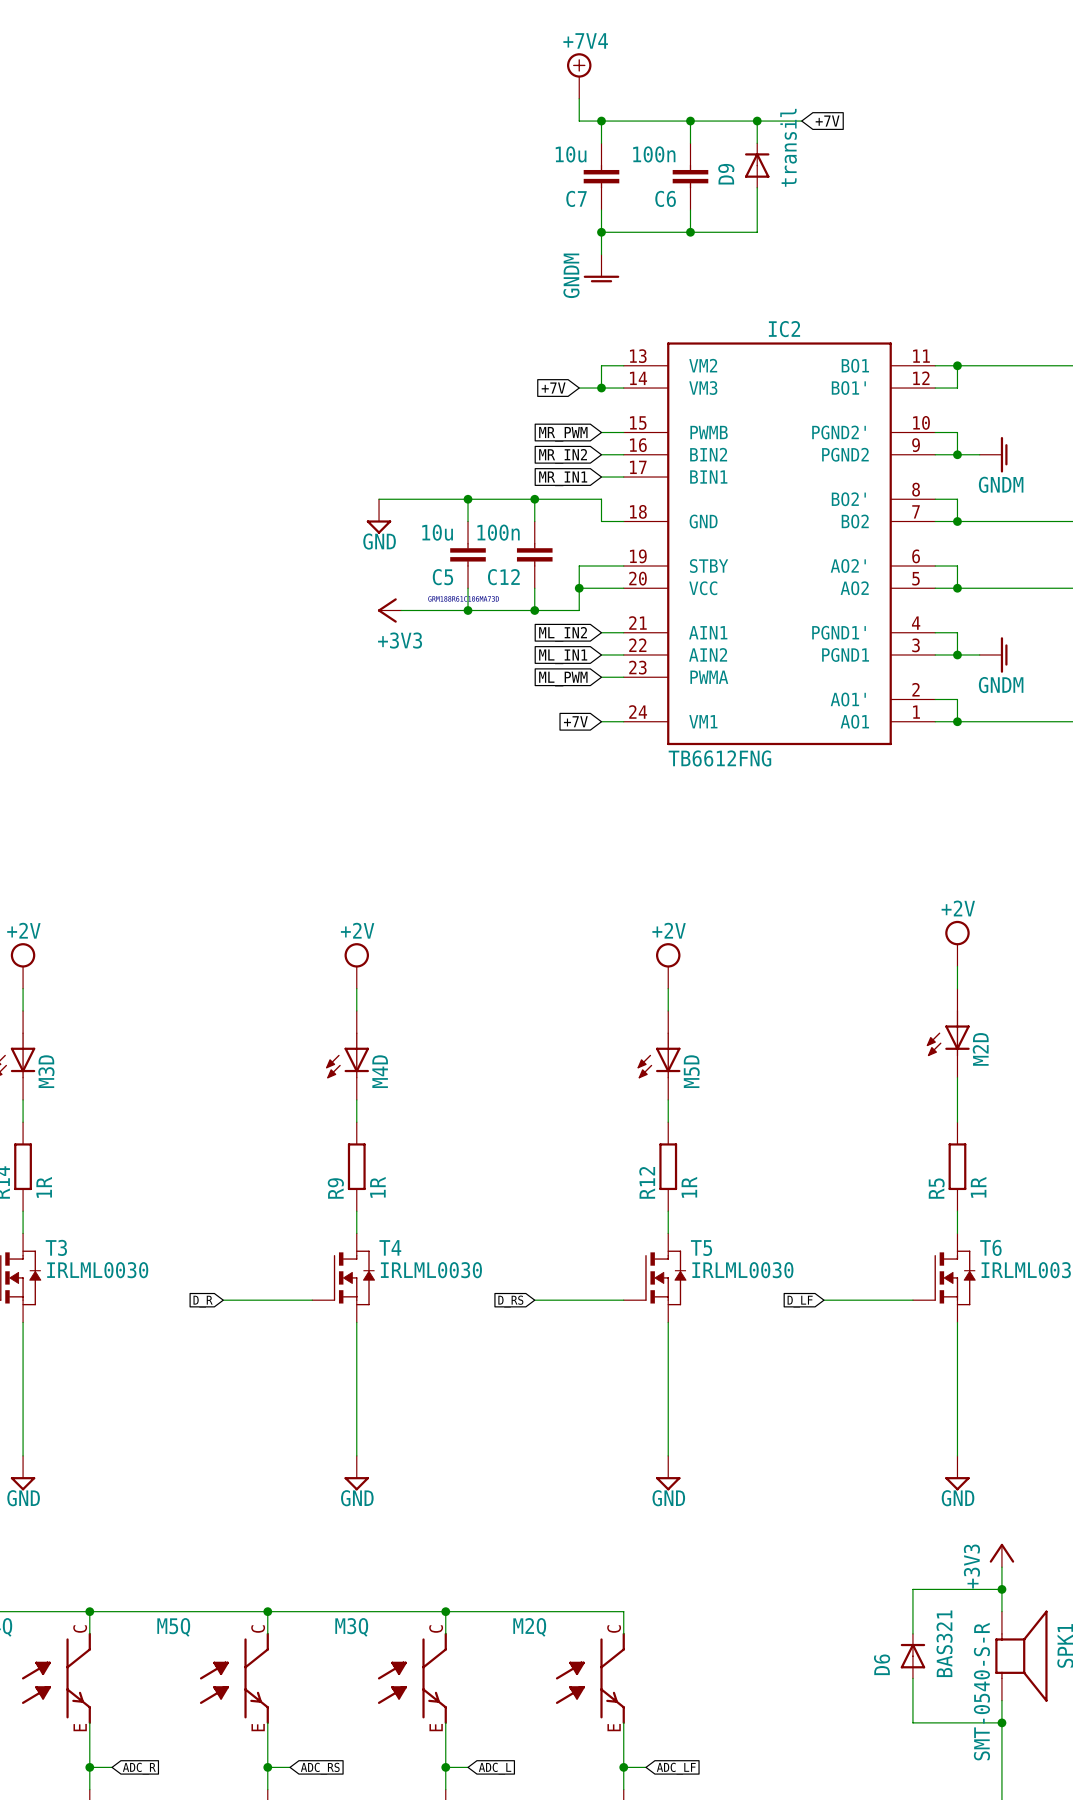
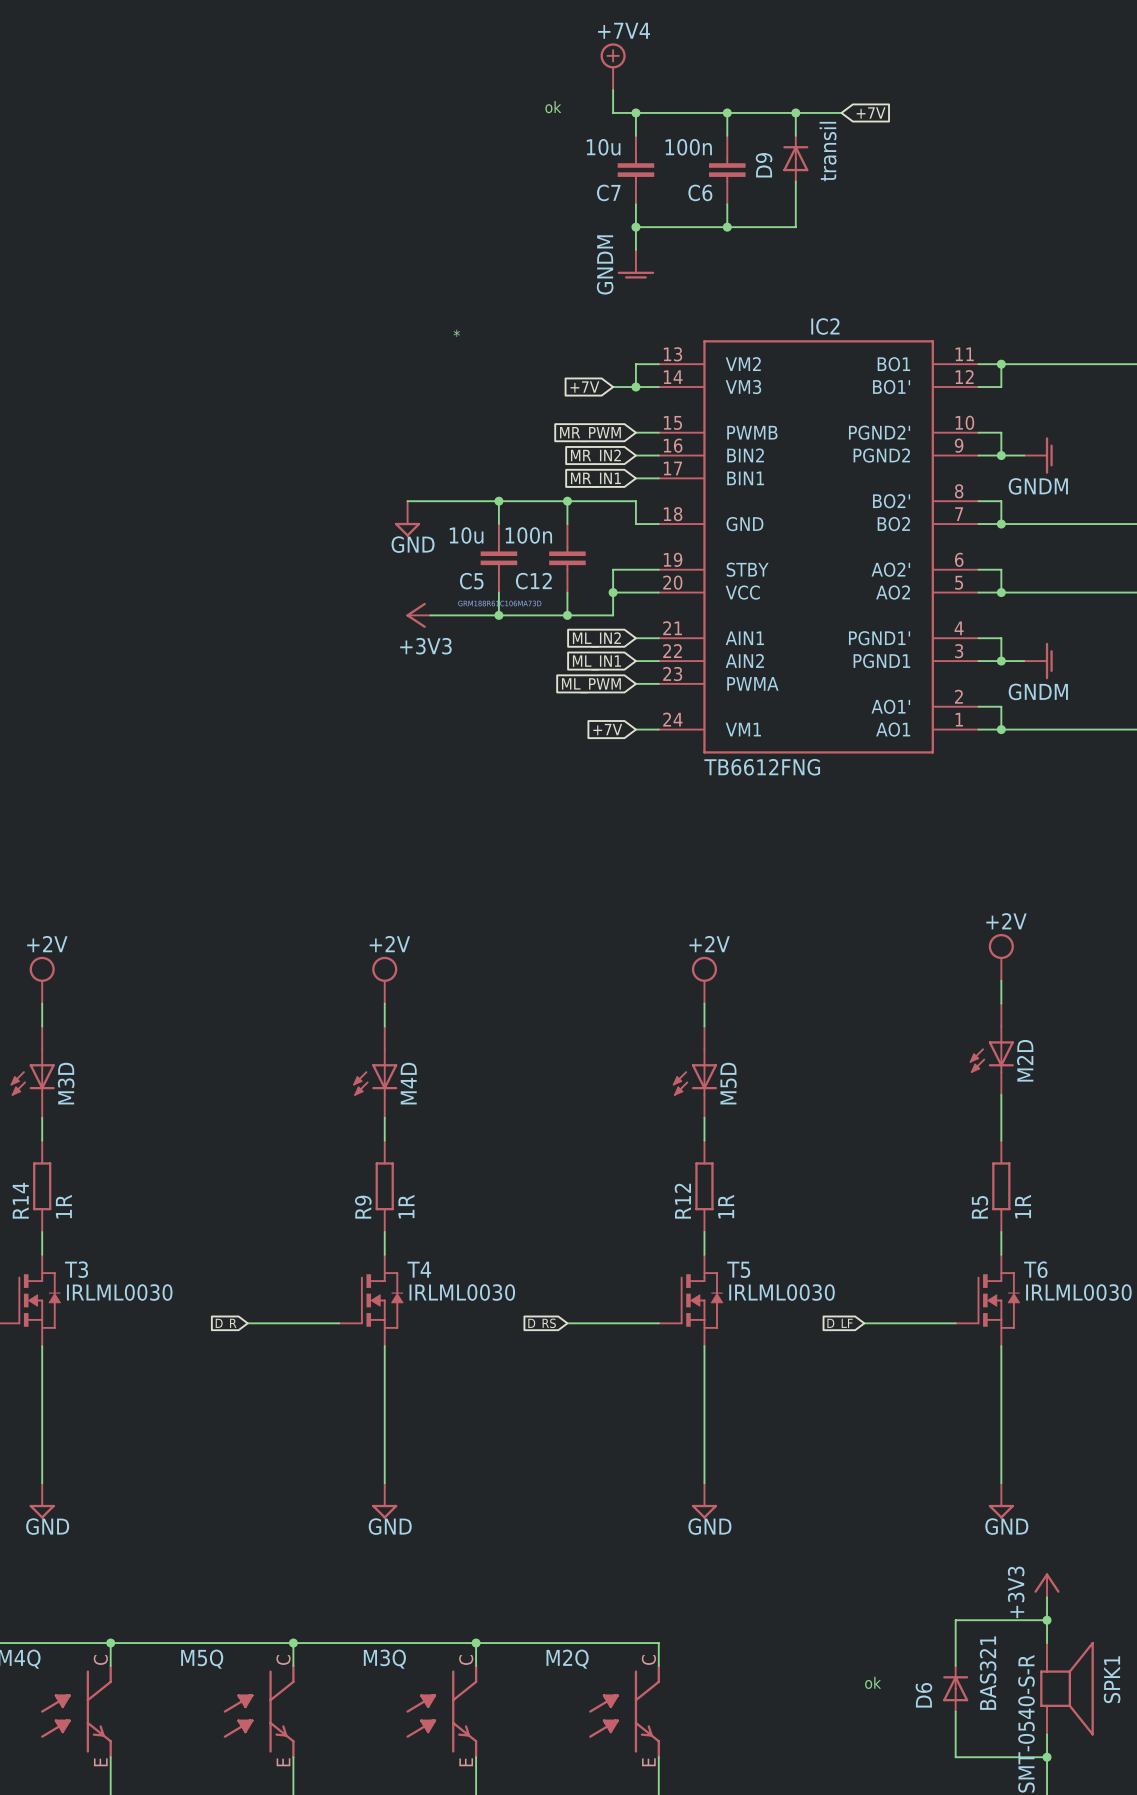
text: none -> ok (553, 107)
text: none -> * (456, 333)
text: none -> ok (873, 1682)

